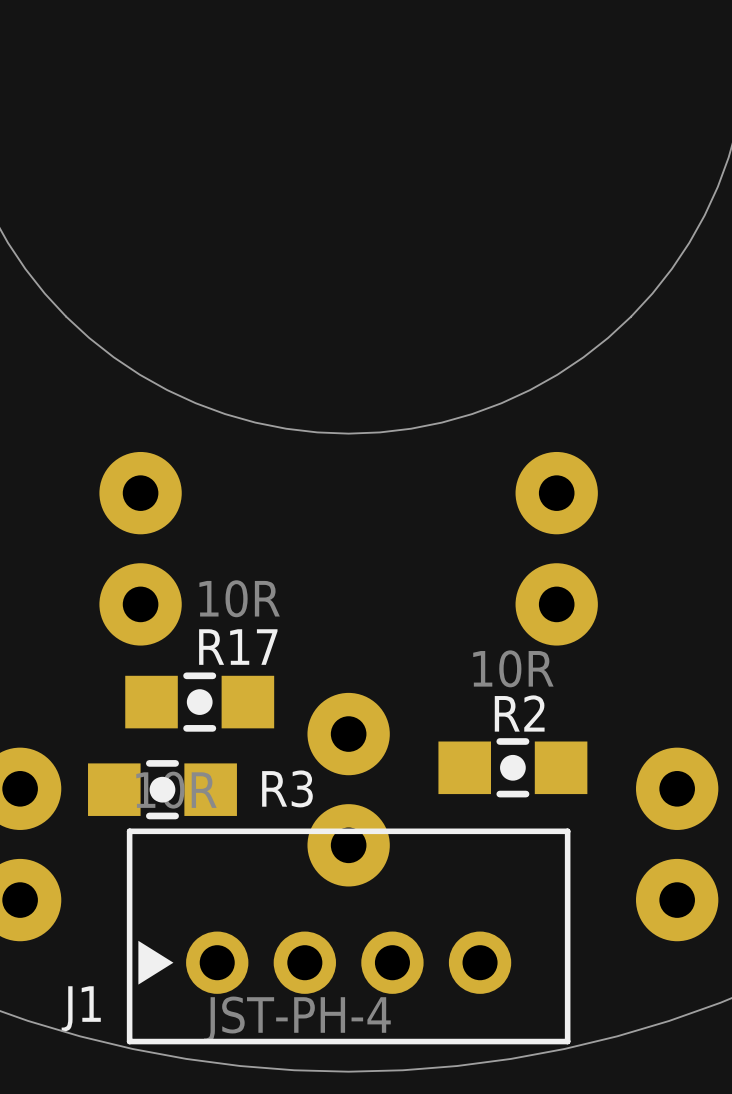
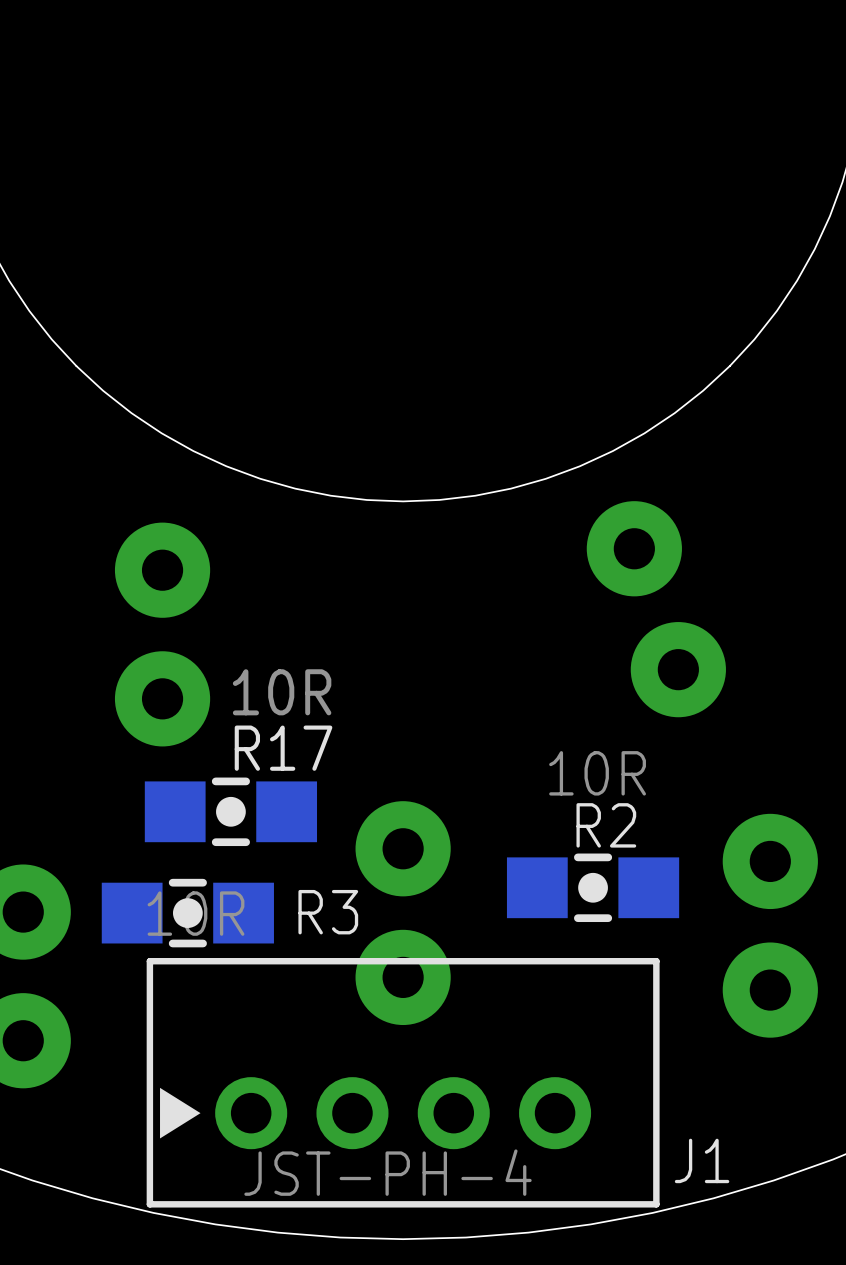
part rotation: 0° (556, 548) -> 20° counterclockwise (656, 609)
part position: (677, 844) -> (770, 925)
J1 name position: J1 (81, 1008) -> J1 (702, 1160)

